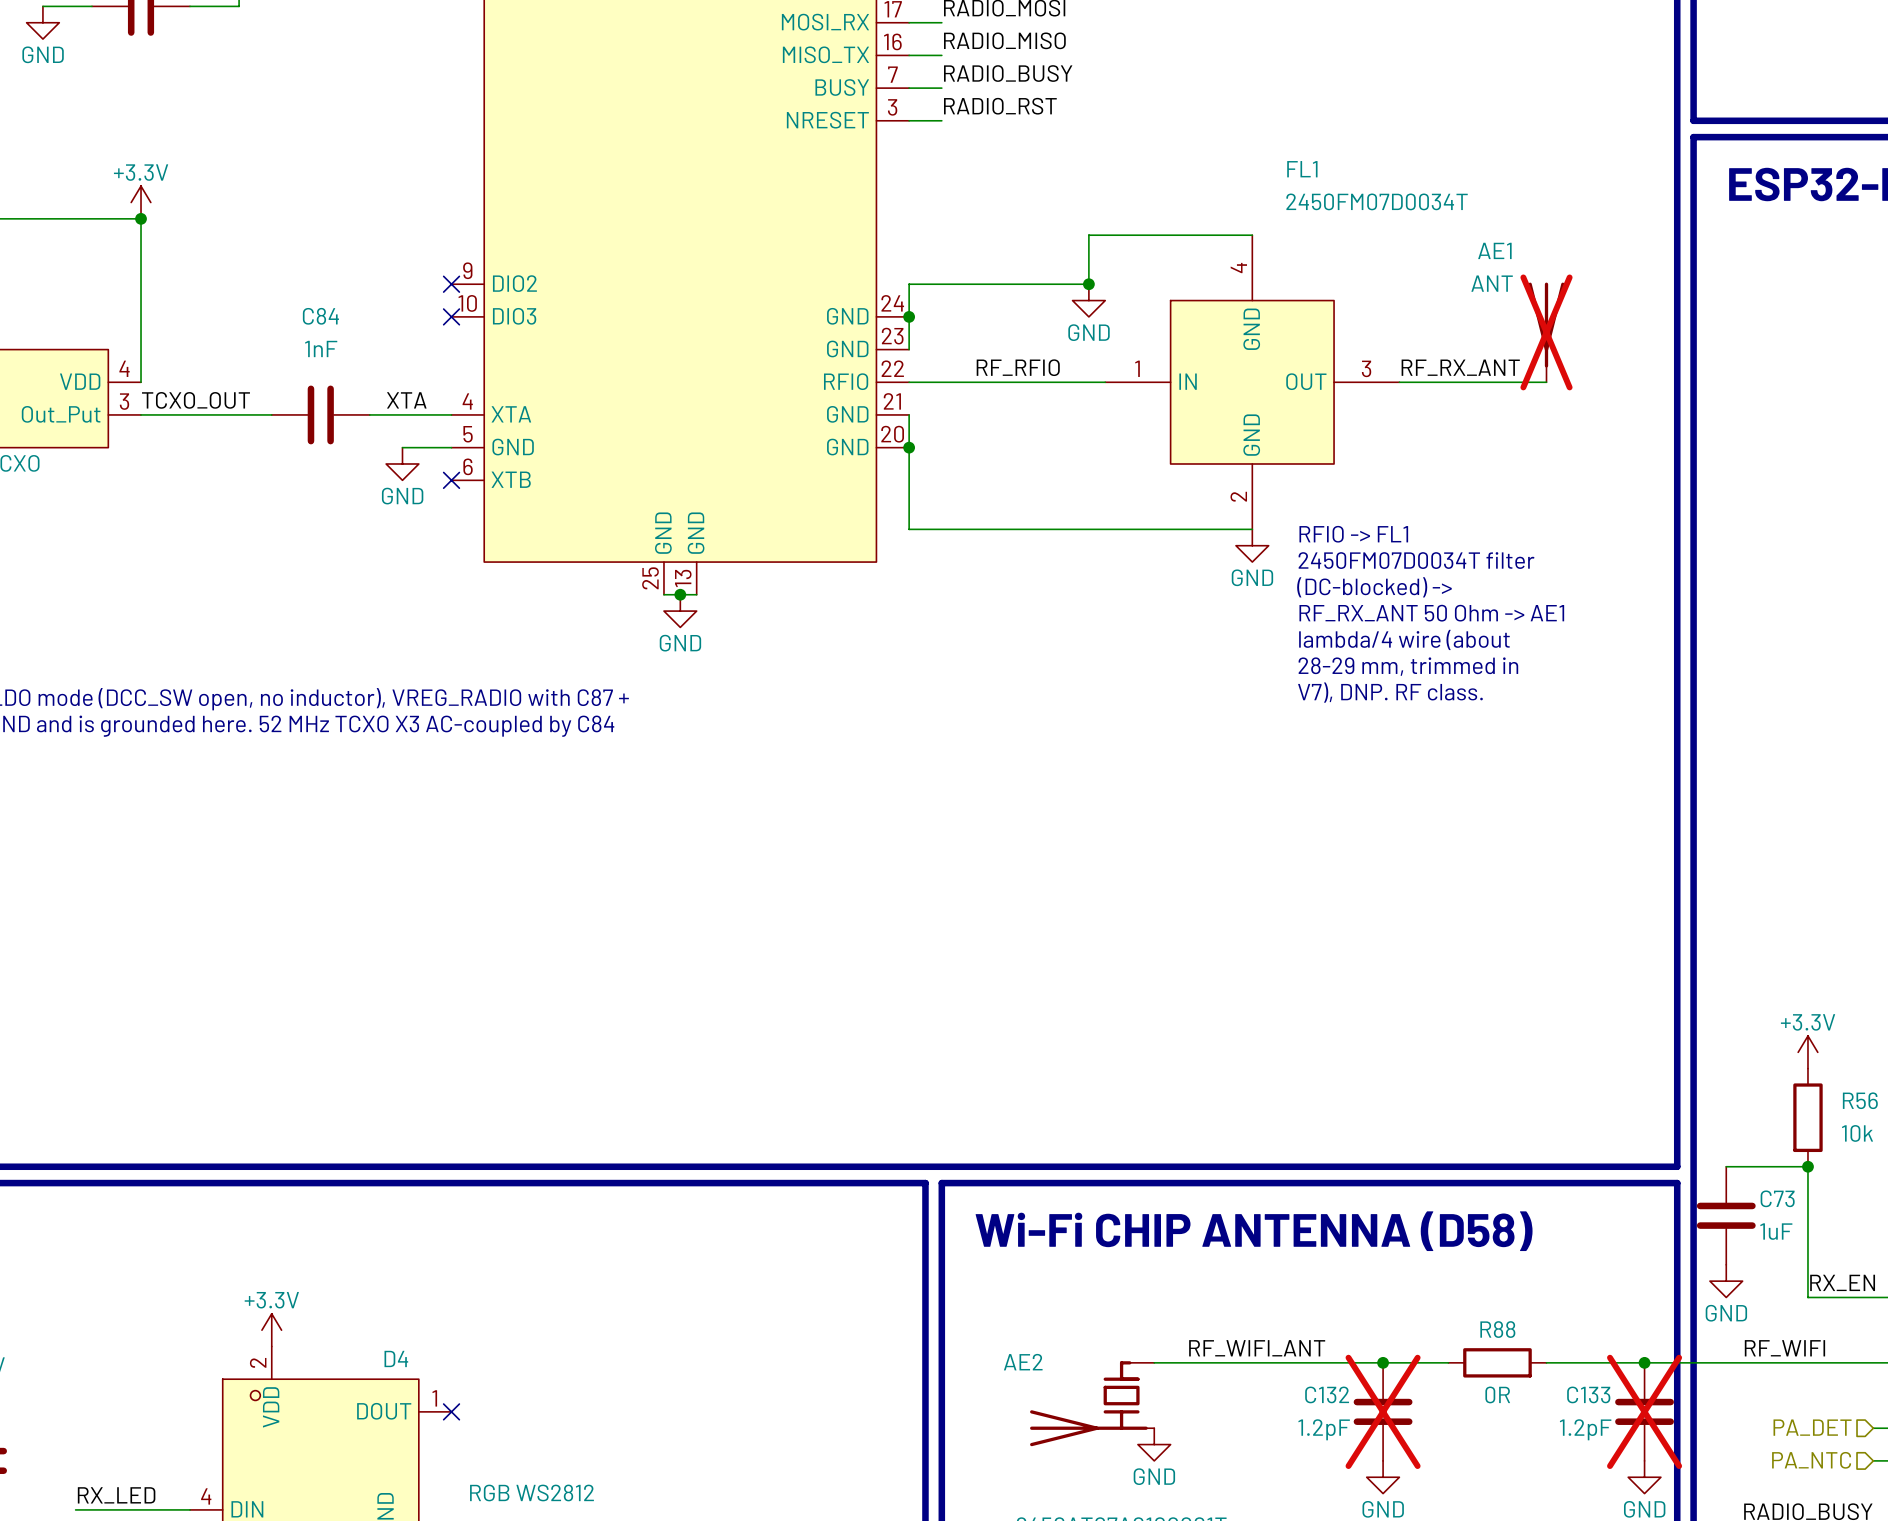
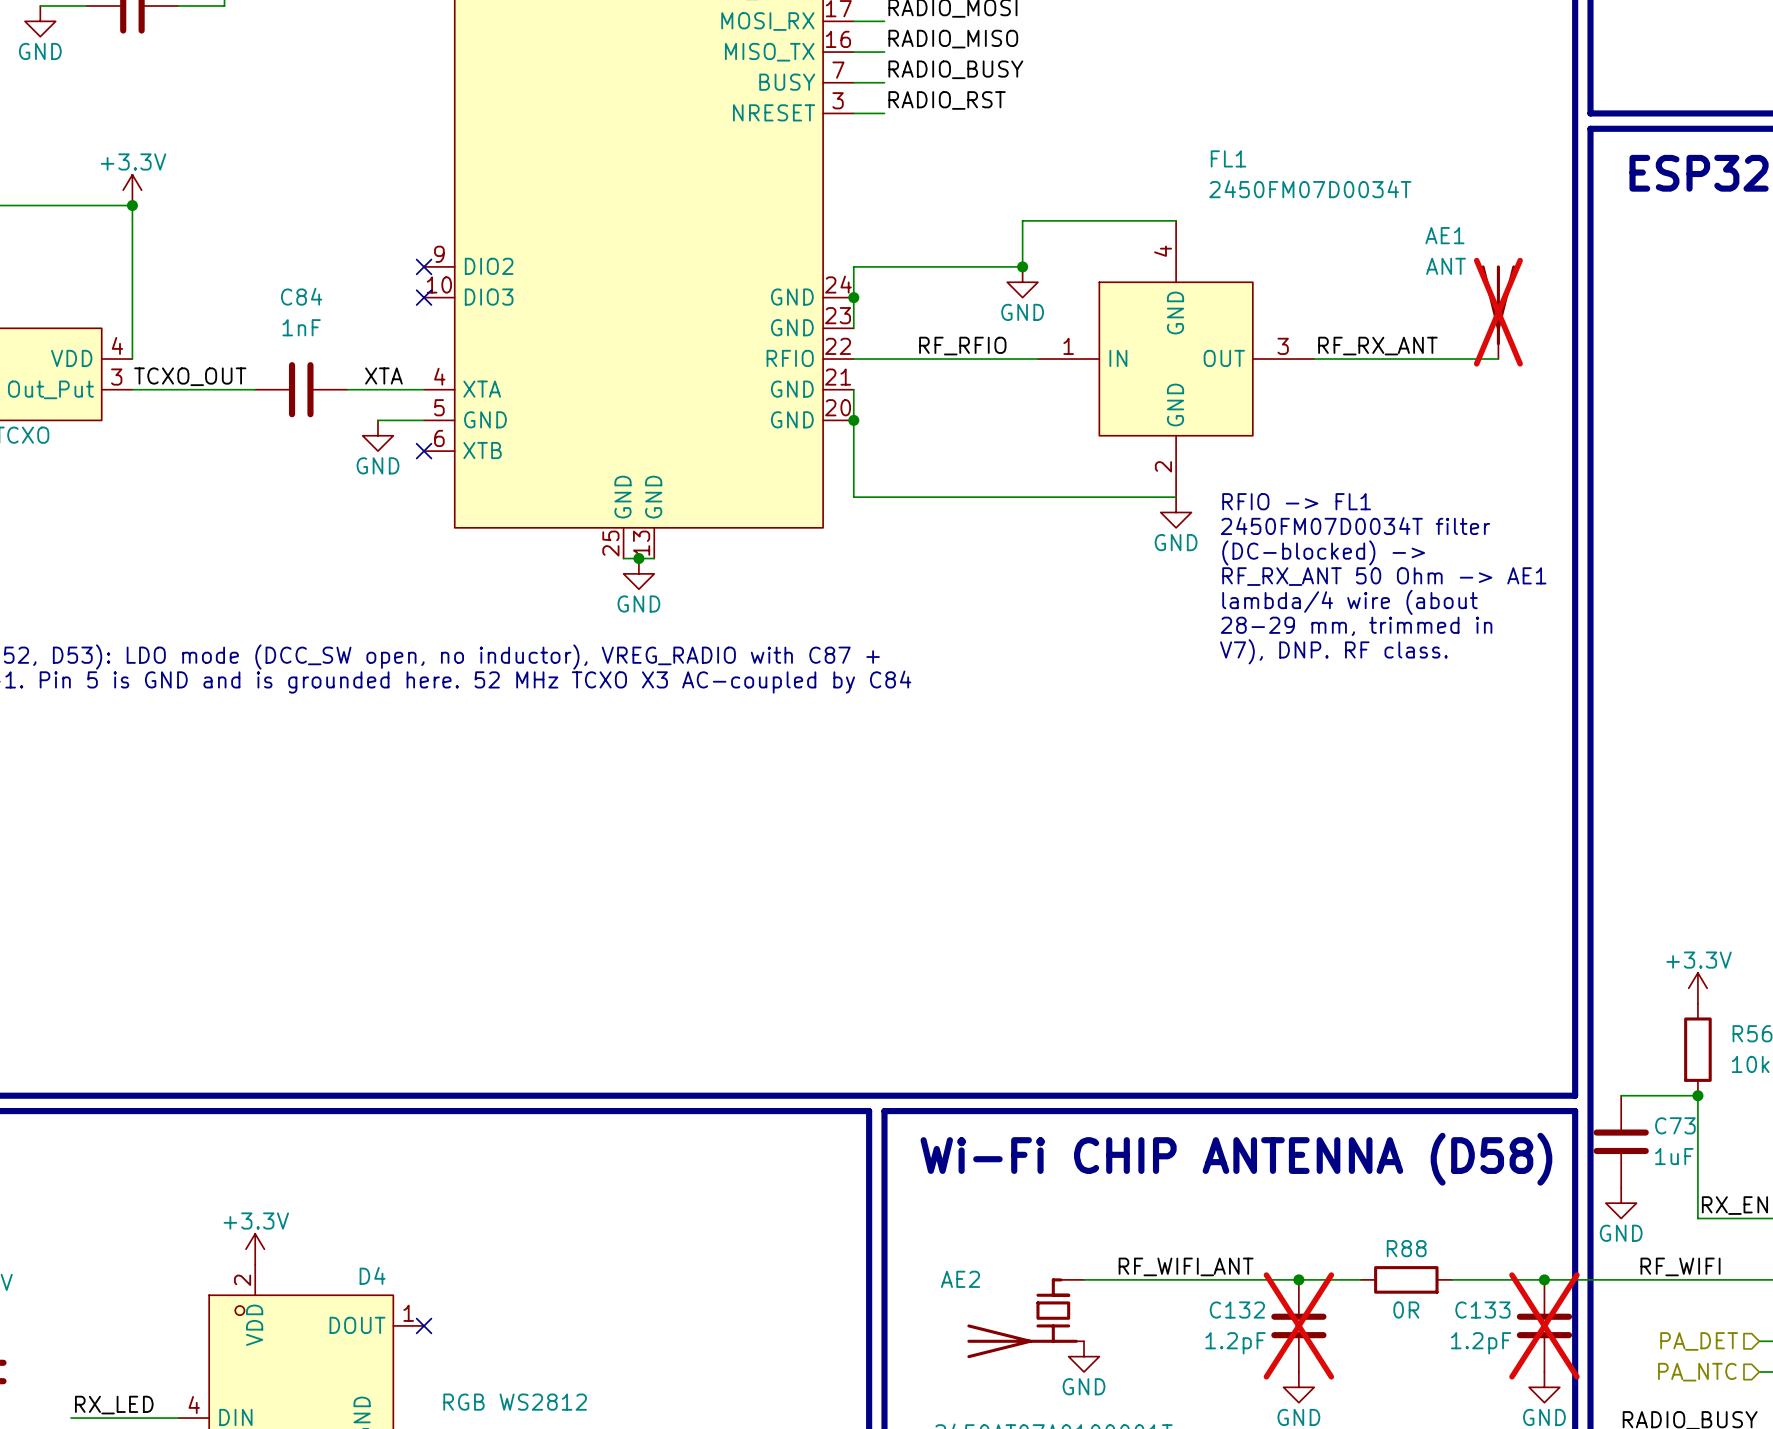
AE1 position: (1546, 332) -> (1498, 312)
wire: none -> (1452, 359) (1498, 359)

